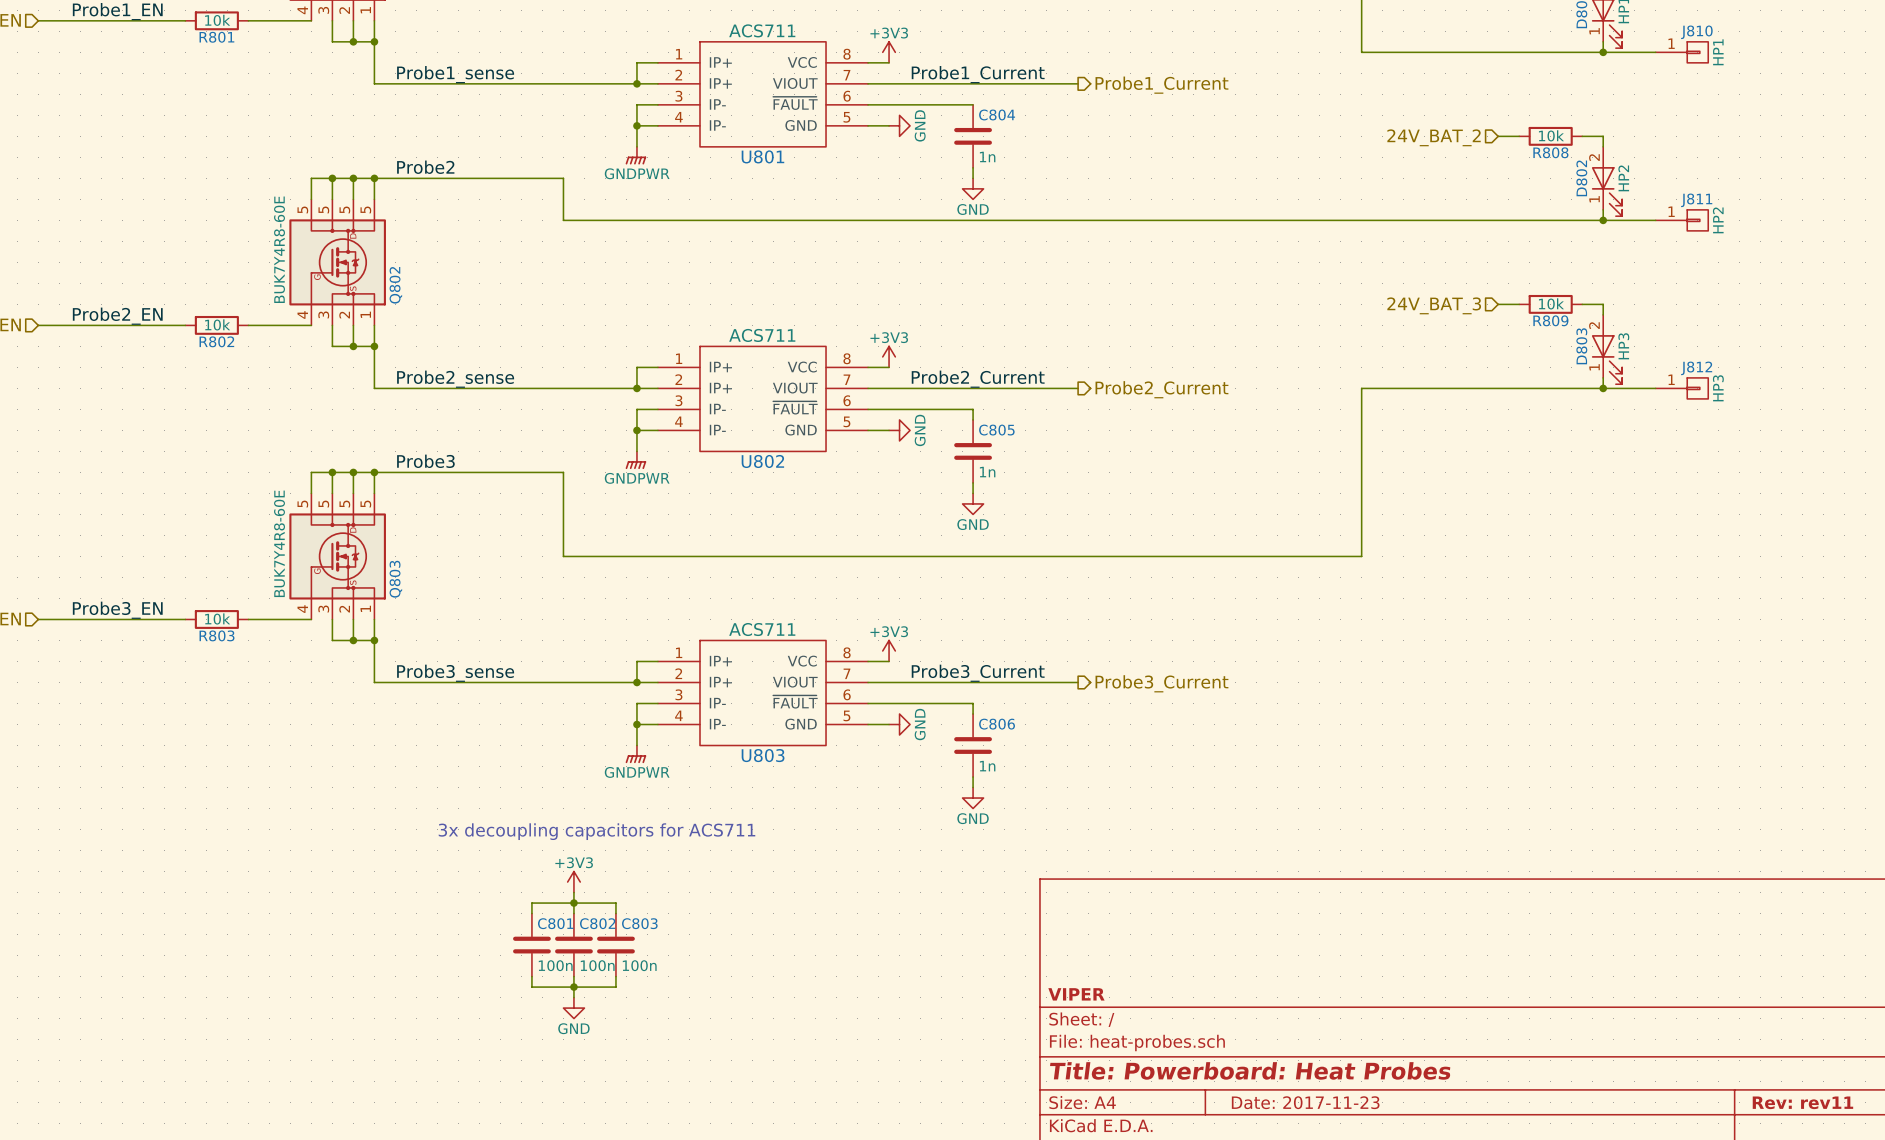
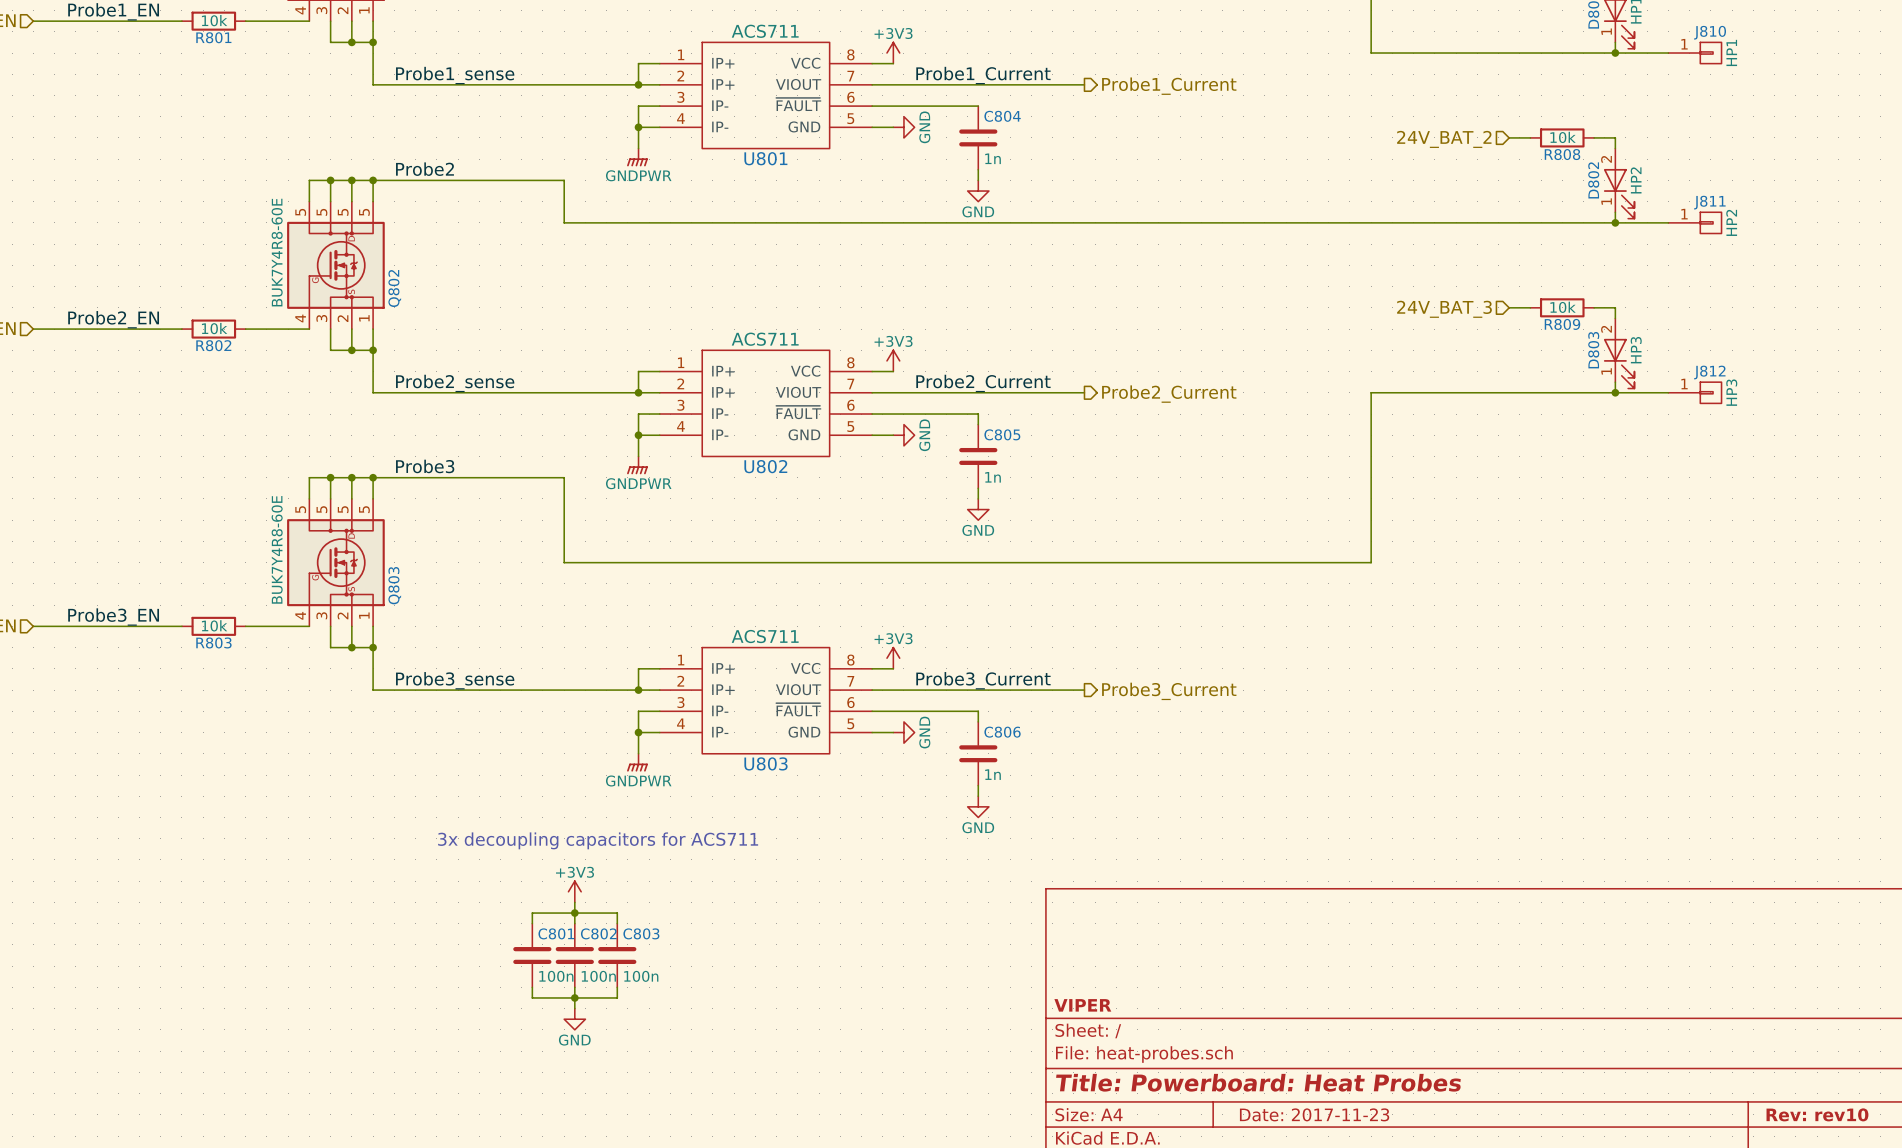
title block: Rev: rev11 (1802, 1102) -> Rev: rev10 (1817, 1114)

